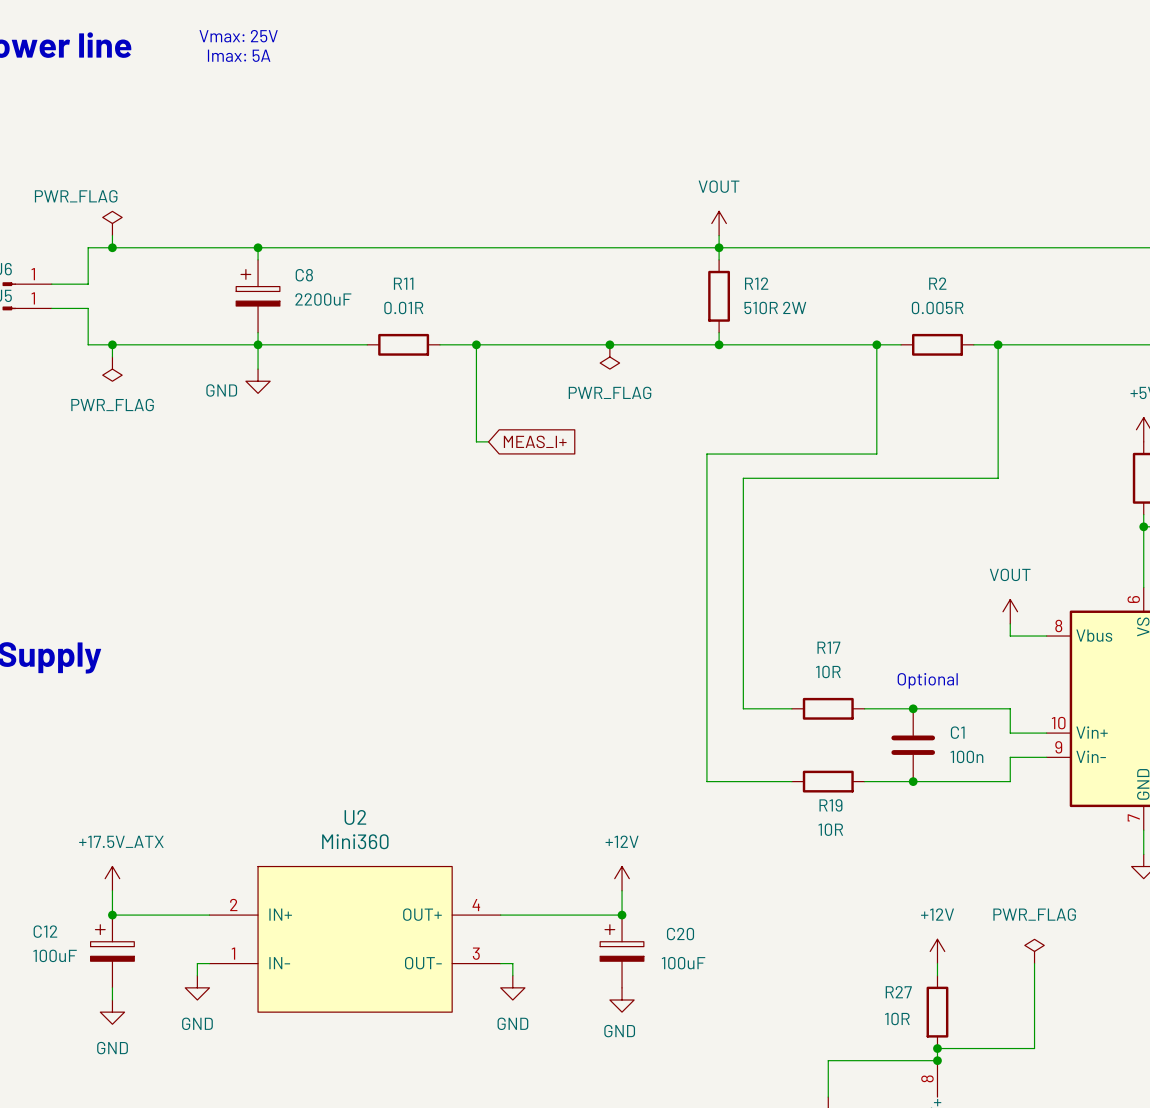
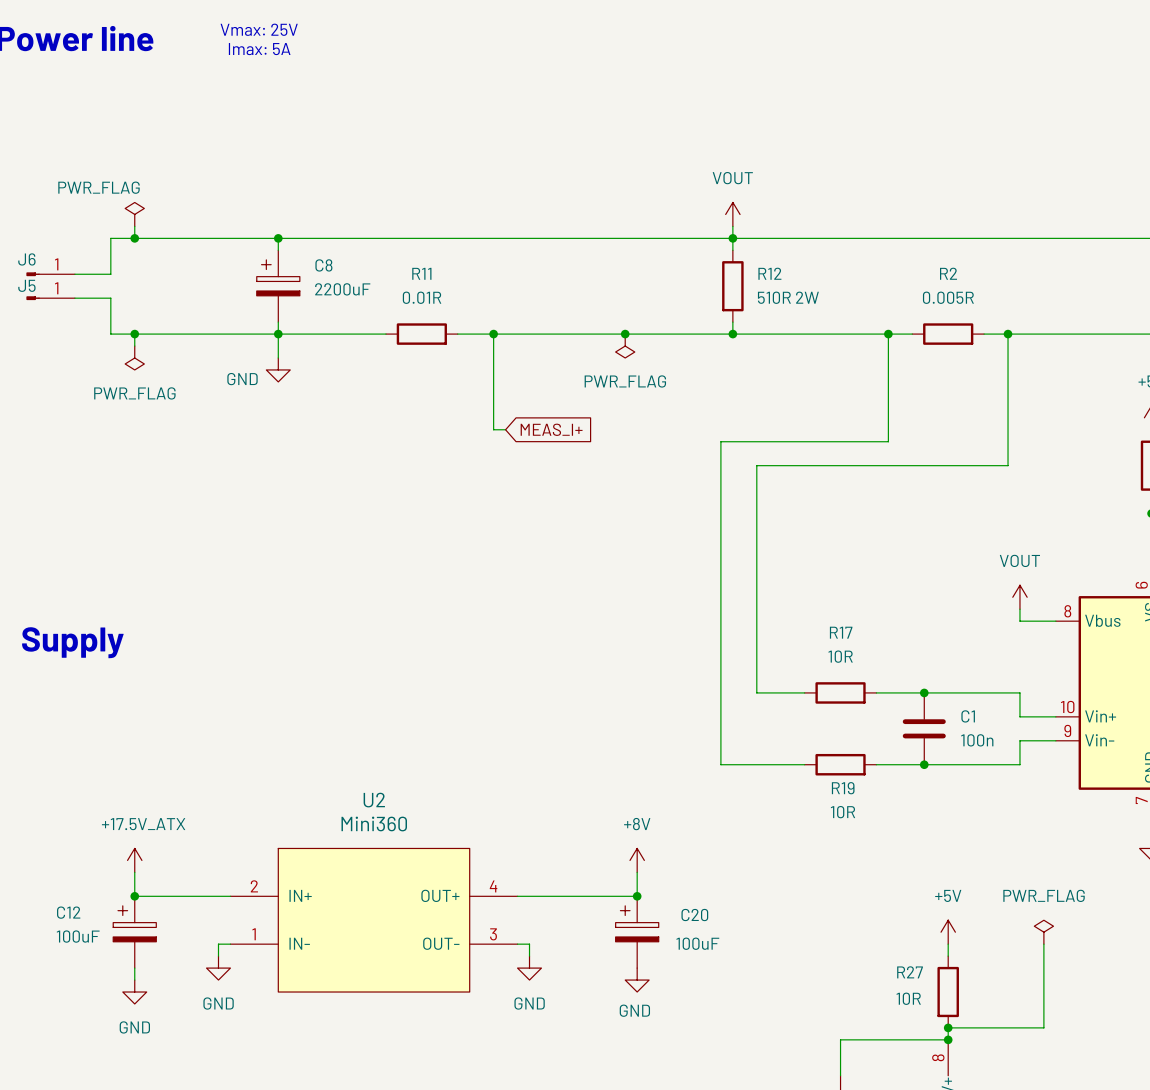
text: Optional (927, 680) -> none
power symbol: +12V (622, 878) -> +8V (637, 860)
power symbol: +12V (937, 951) -> +5V (948, 932)

